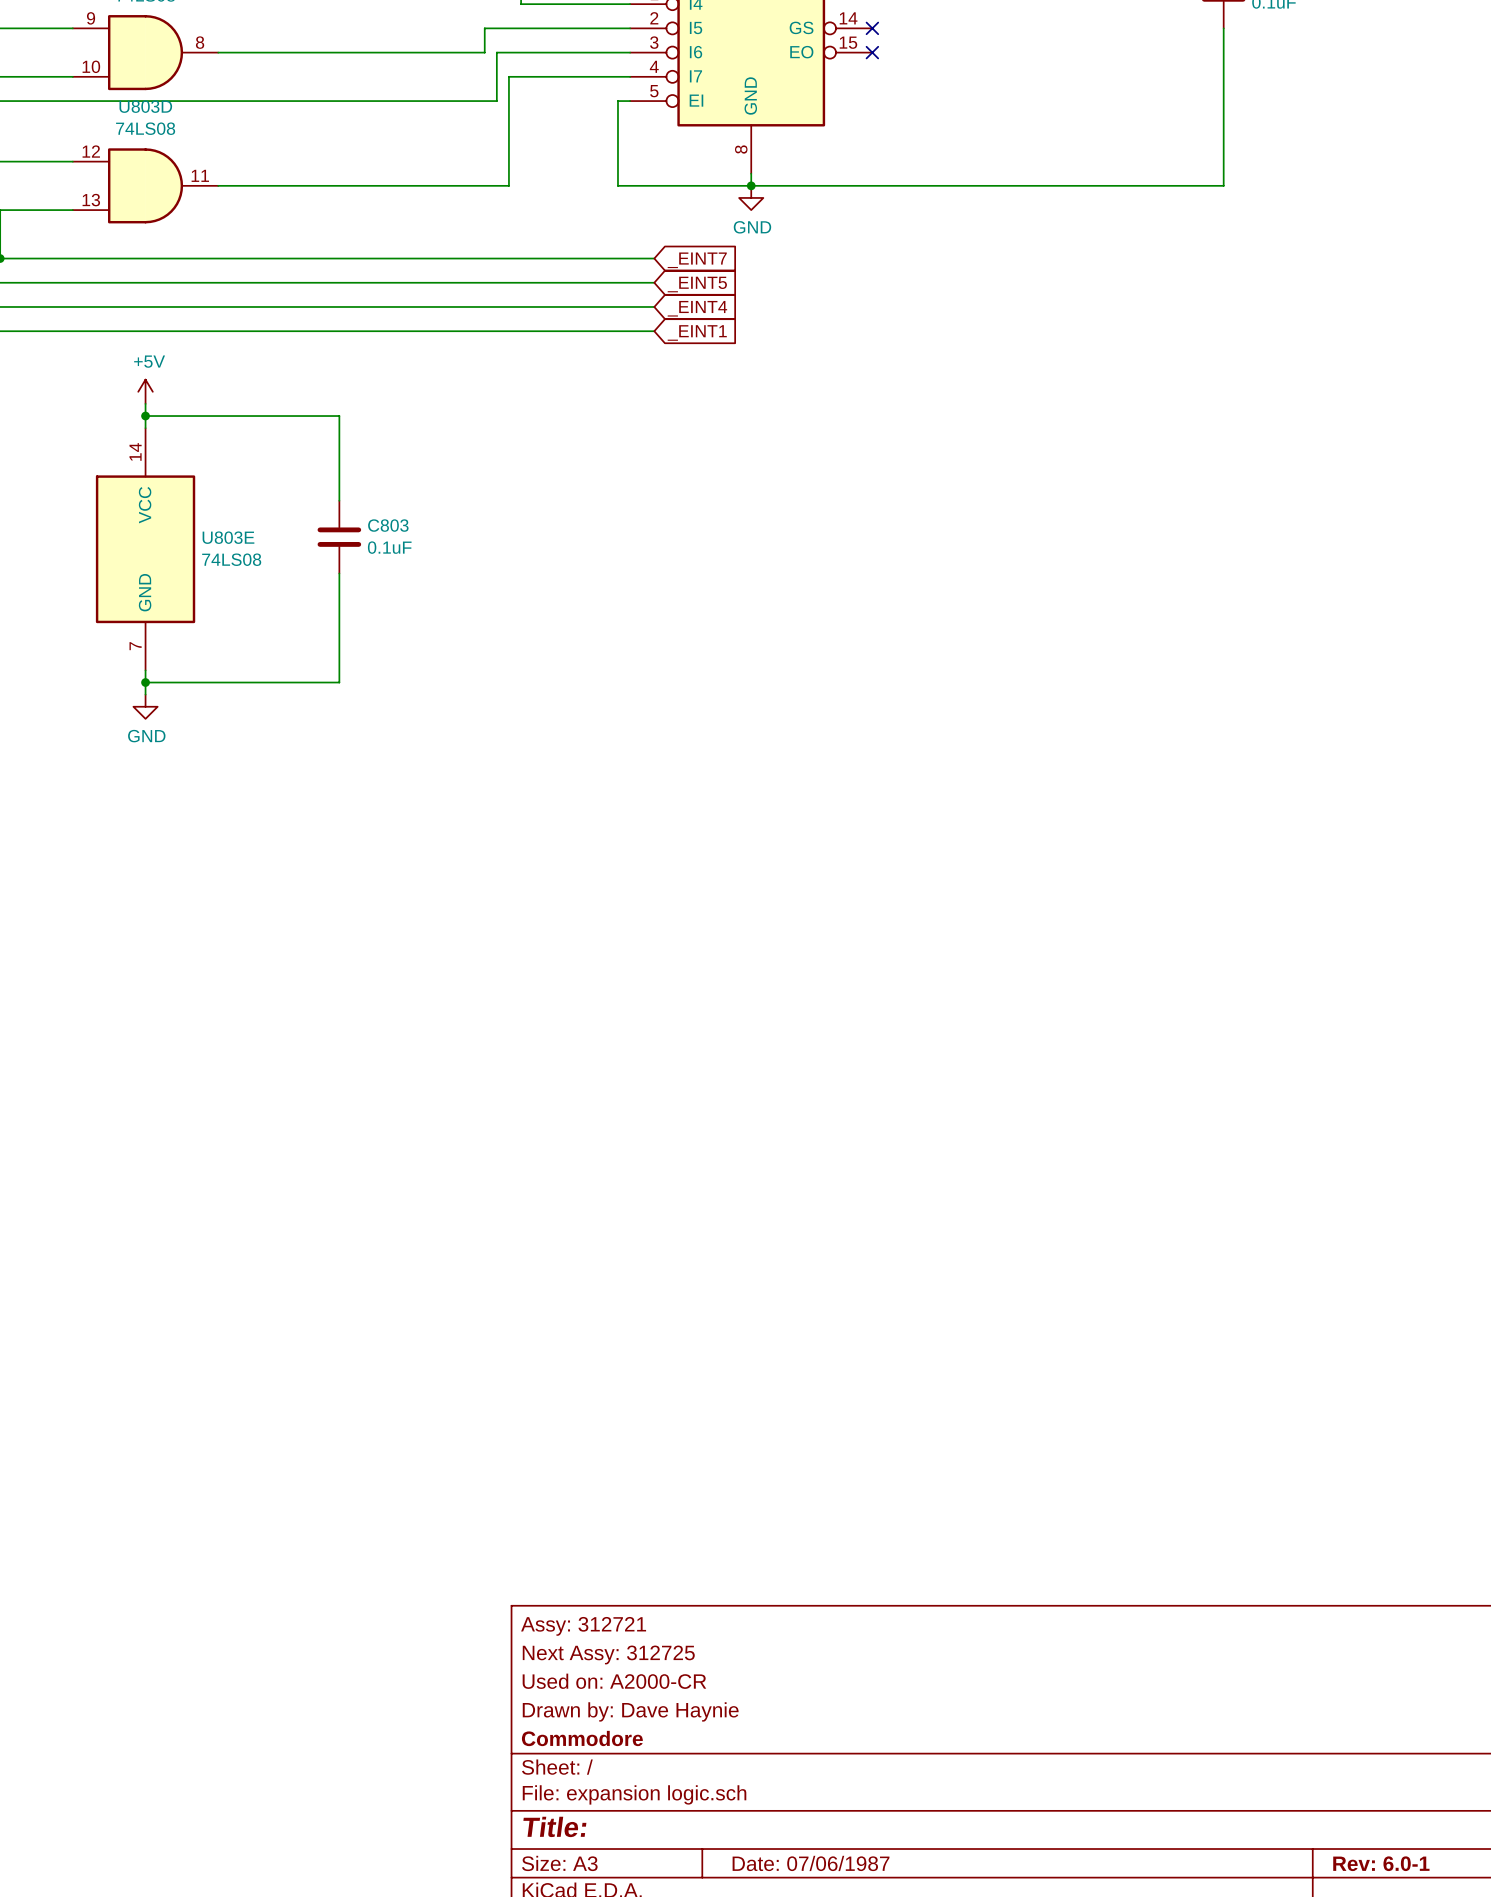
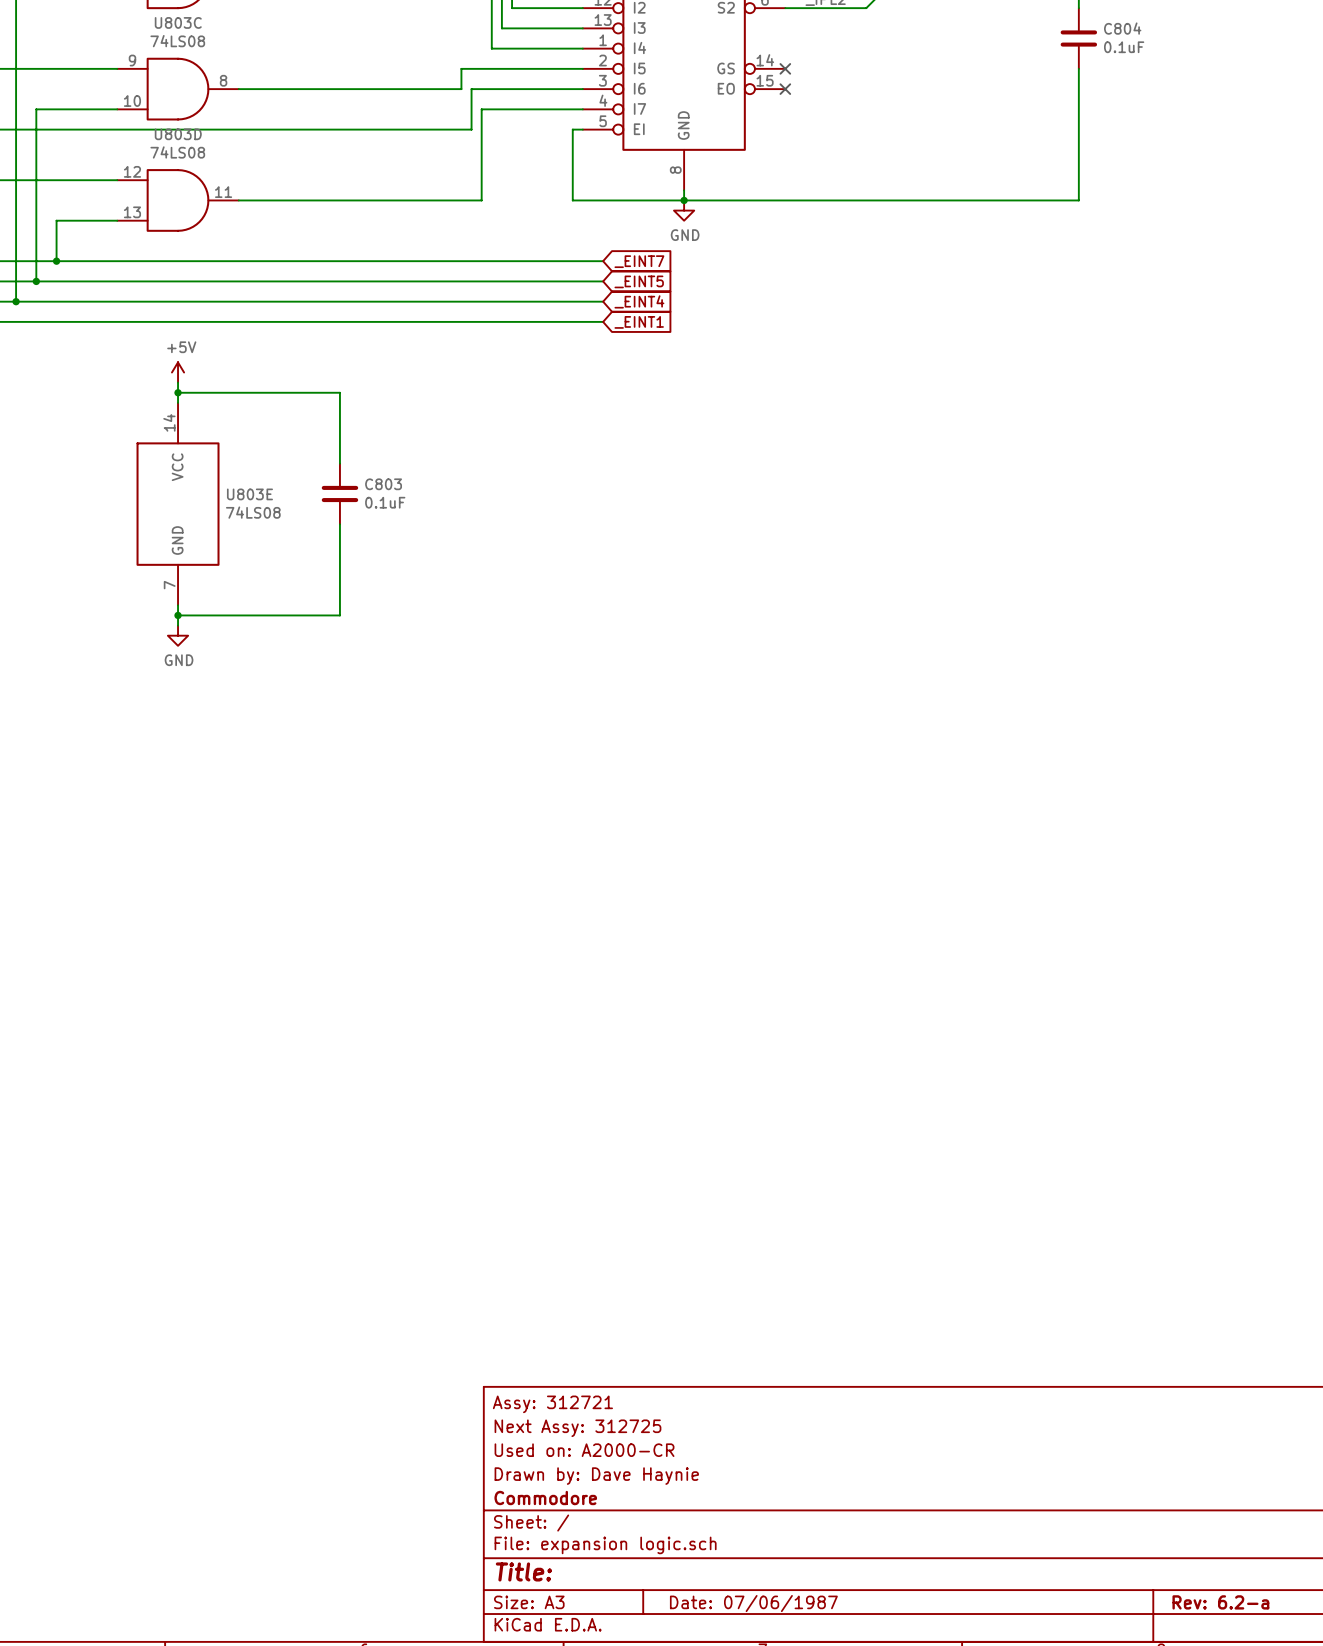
title block: Rev: 6.0-1 (1381, 1863) -> Rev: 6.2-a (1220, 1602)

